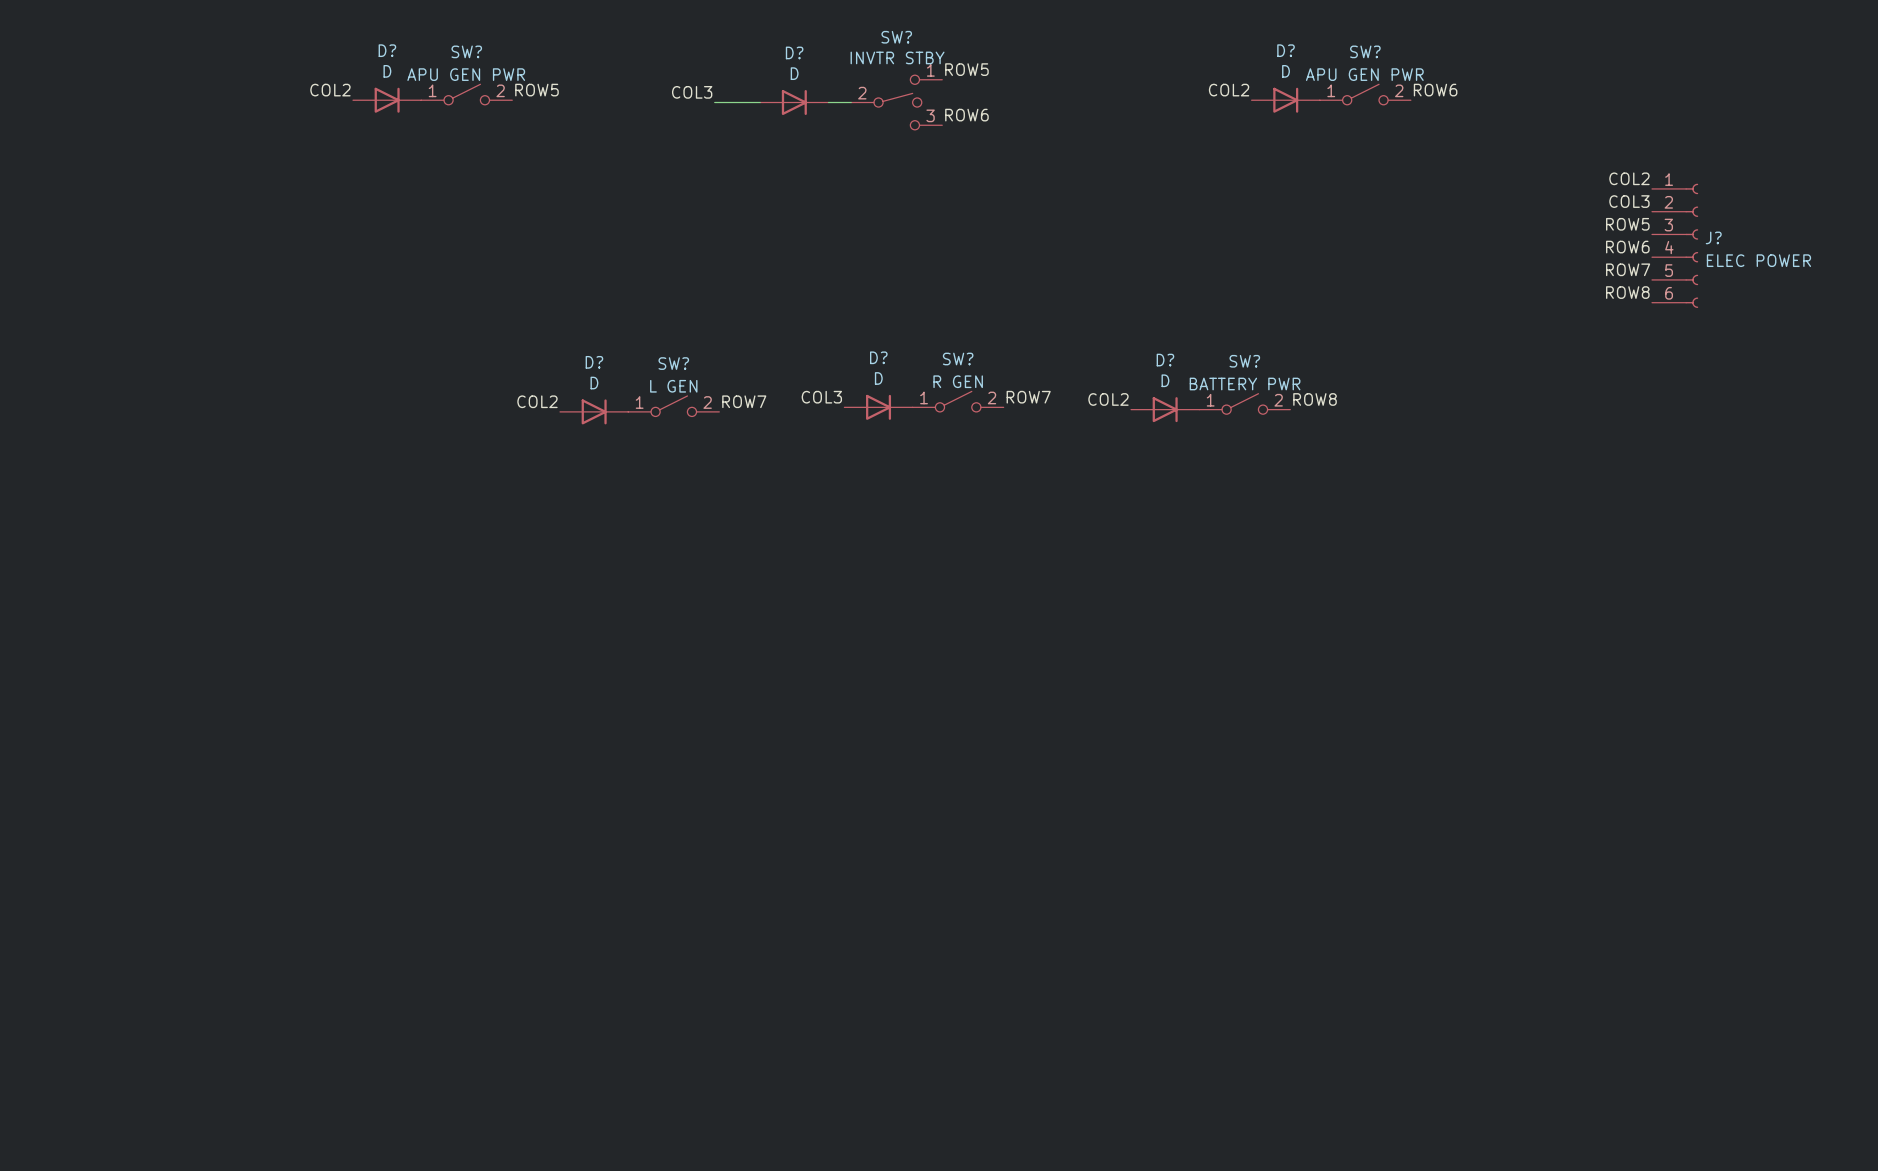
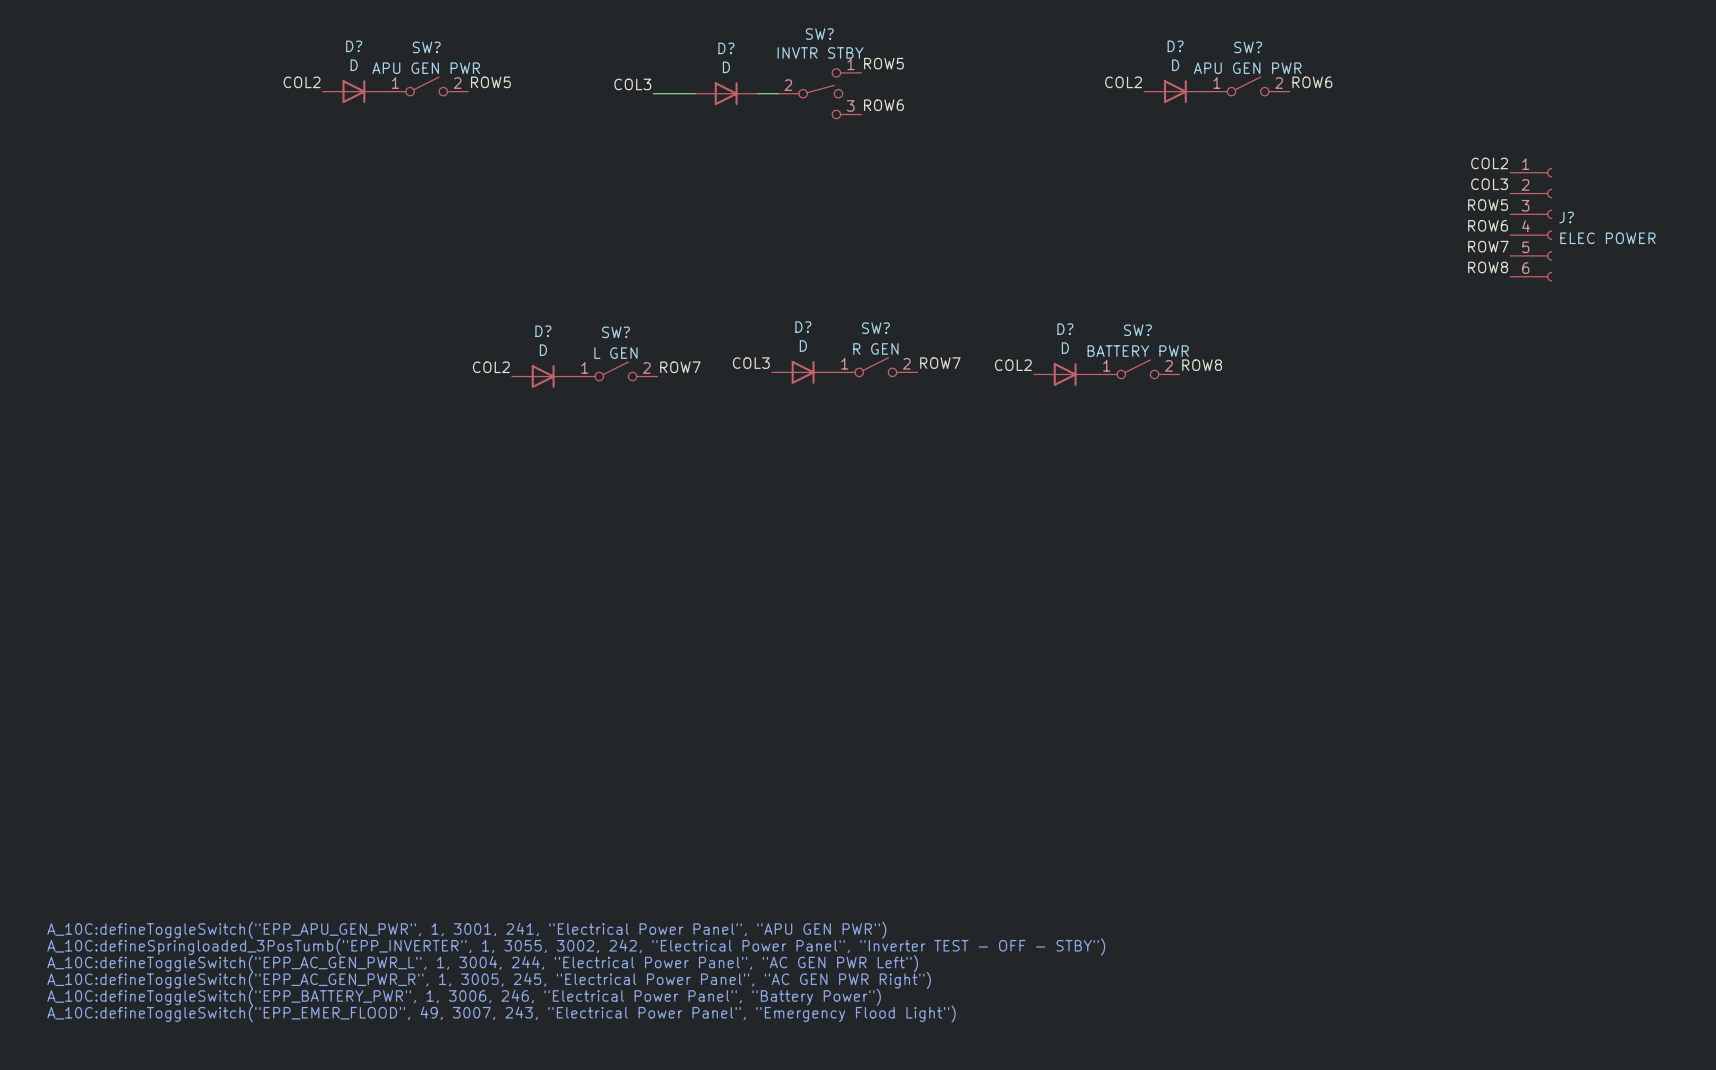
text: none -> A_10C:defineToggleSwitch("EPP_APU_GEN_PWR", 1, 3001, 241, "Electrical Power Panel", "APU GEN PWR") (466, 930)
text: none -> A_10C:defineSpringloaded_3PosTumb("EPP_INVERTER", 1, 3055, 3002, 242, "Electrical Power Panel", "Inverter TEST - OFF - STBY") (576, 947)
text: none -> A_10C:defineToggleSwitch("EPP_AC_GEN_PWR_L", 1, 3004, 244, "Electrical Power Panel", "AC GEN PWR Left") (482, 963)
text: none -> A_10C:defineToggleSwitch("EPP_AC_GEN_PWR_R", 1, 3005, 245, "Electrical Power Panel", "AC GEN PWR Right") (489, 980)
text: none -> A_10C:defineToggleSwitch("EPP_BATTERY_PWR", 1, 3006, 246, "Electrical Power Panel", "Battery Power") (464, 997)
text: none -> A_10C:defineToggleSwitch("EPP_EMER_FLOOD", 49, 3007, 243, "Electrical Power Panel", "Emergency Flood Light") (501, 1013)

